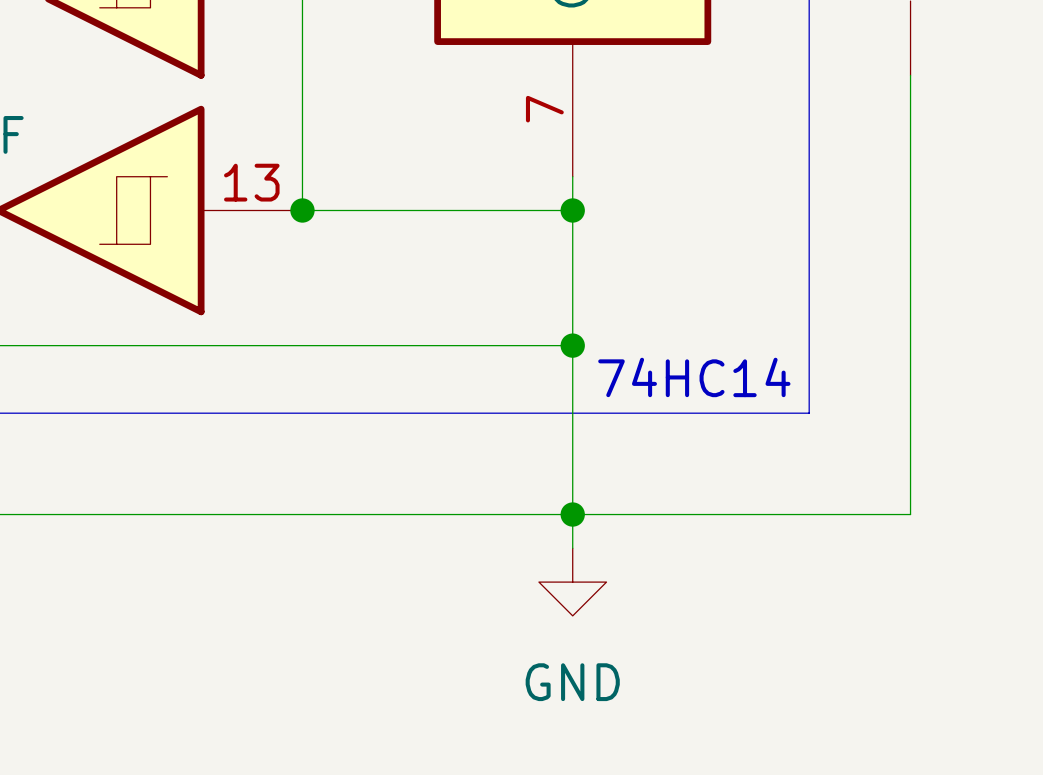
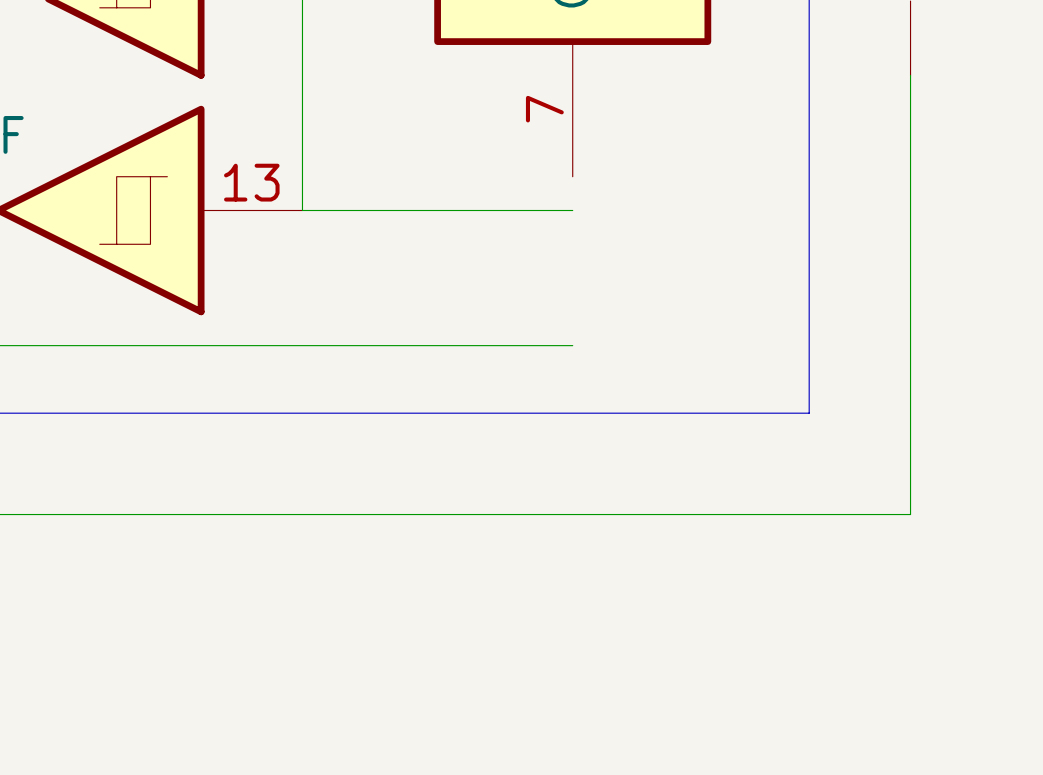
wire: (572, 176) (572, 548) -> none
junction: (302, 210) -> none
junction: (572, 210) -> none
junction: (572, 345) -> none
text: 74HC14 (694, 377) -> none
junction: (572, 514) -> none
power symbol: GND (572, 582) -> none

